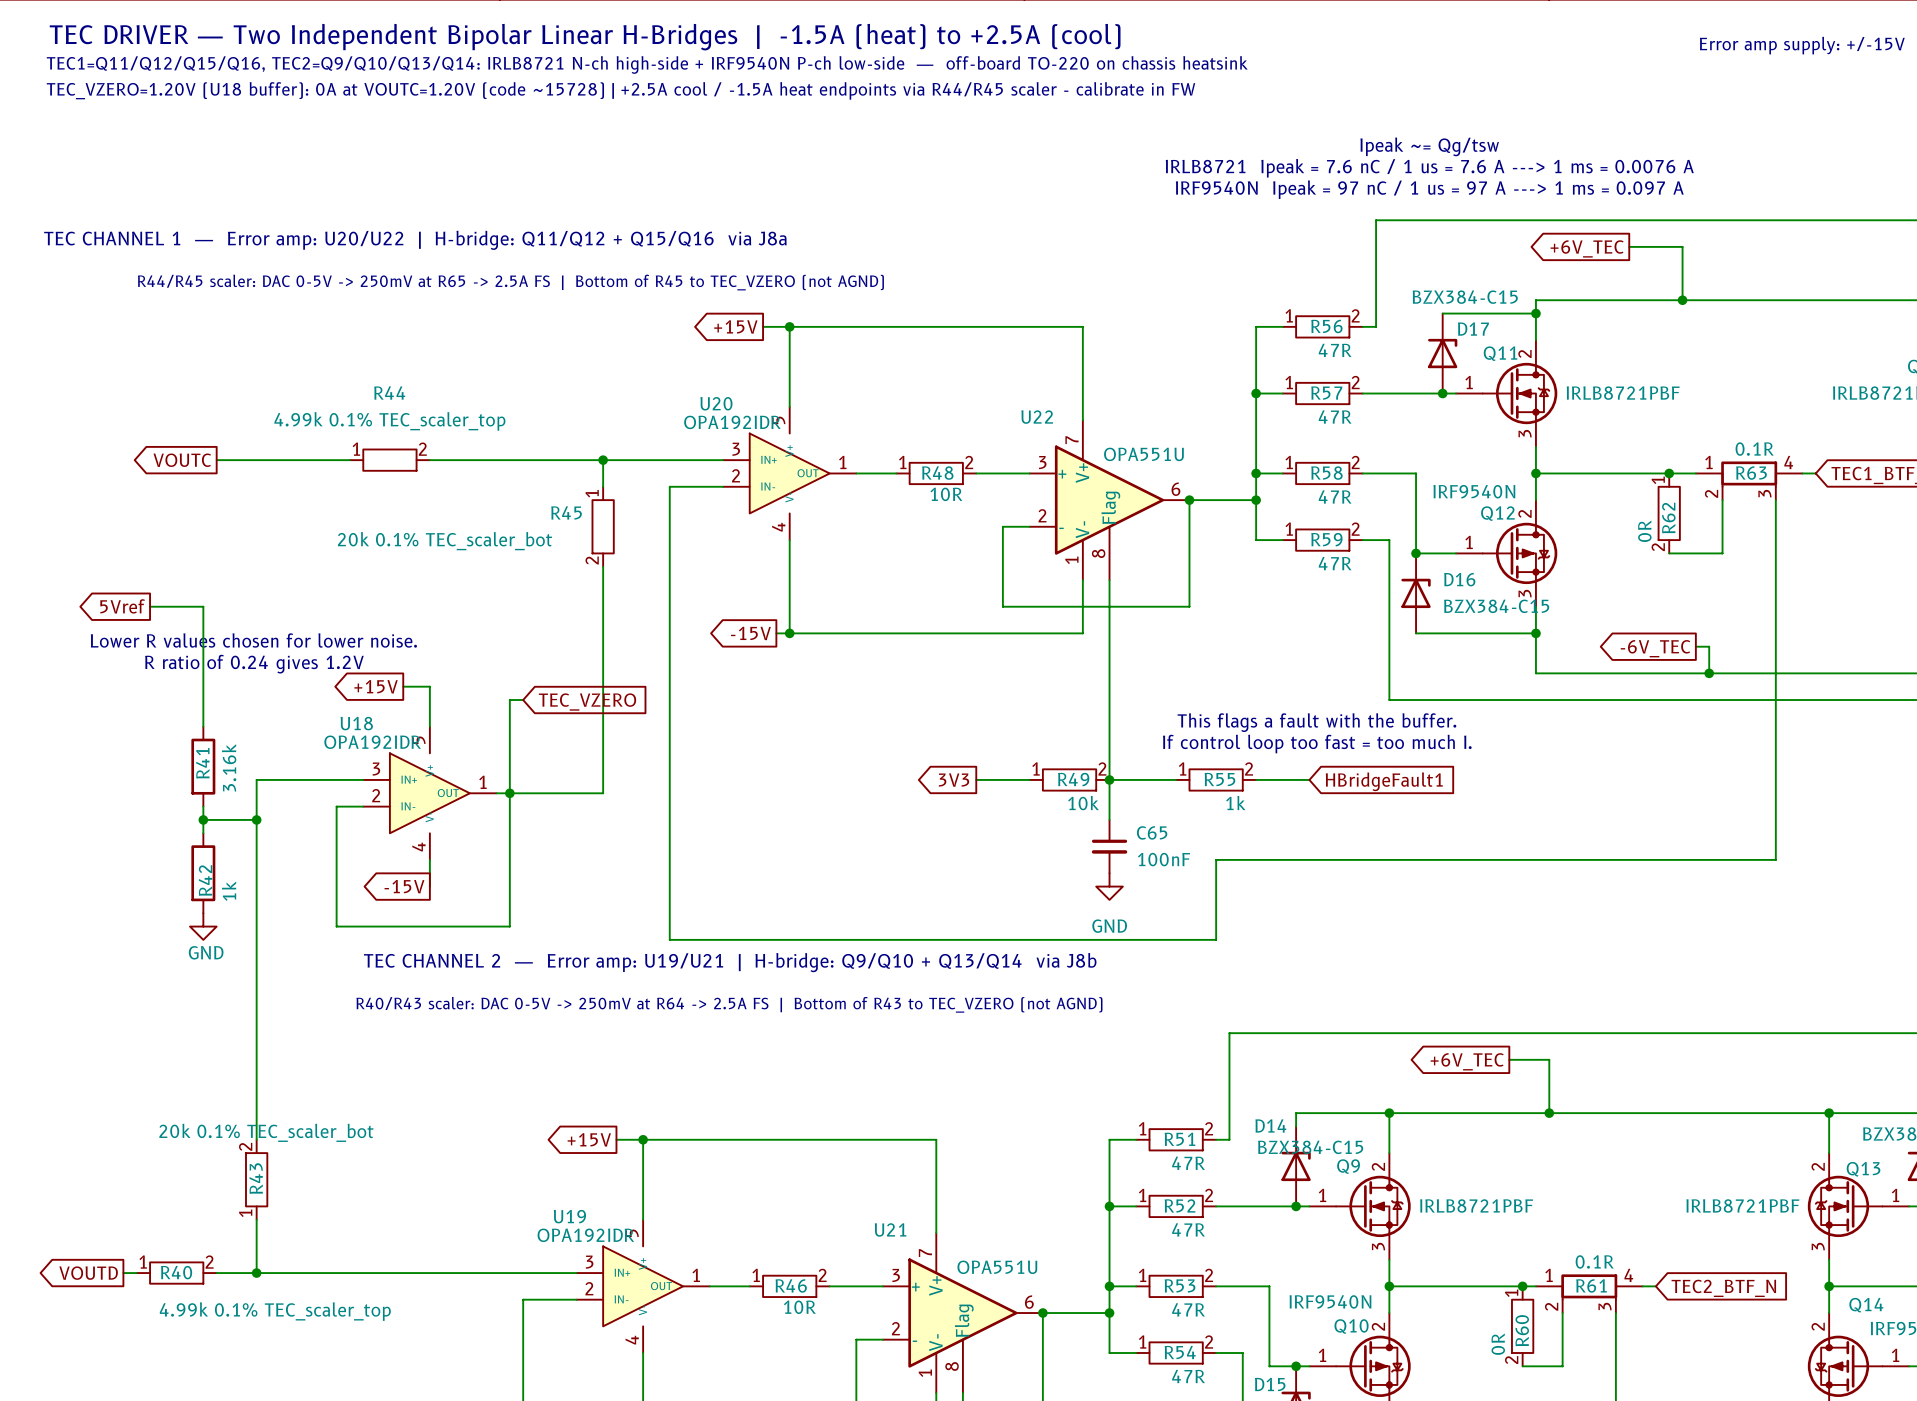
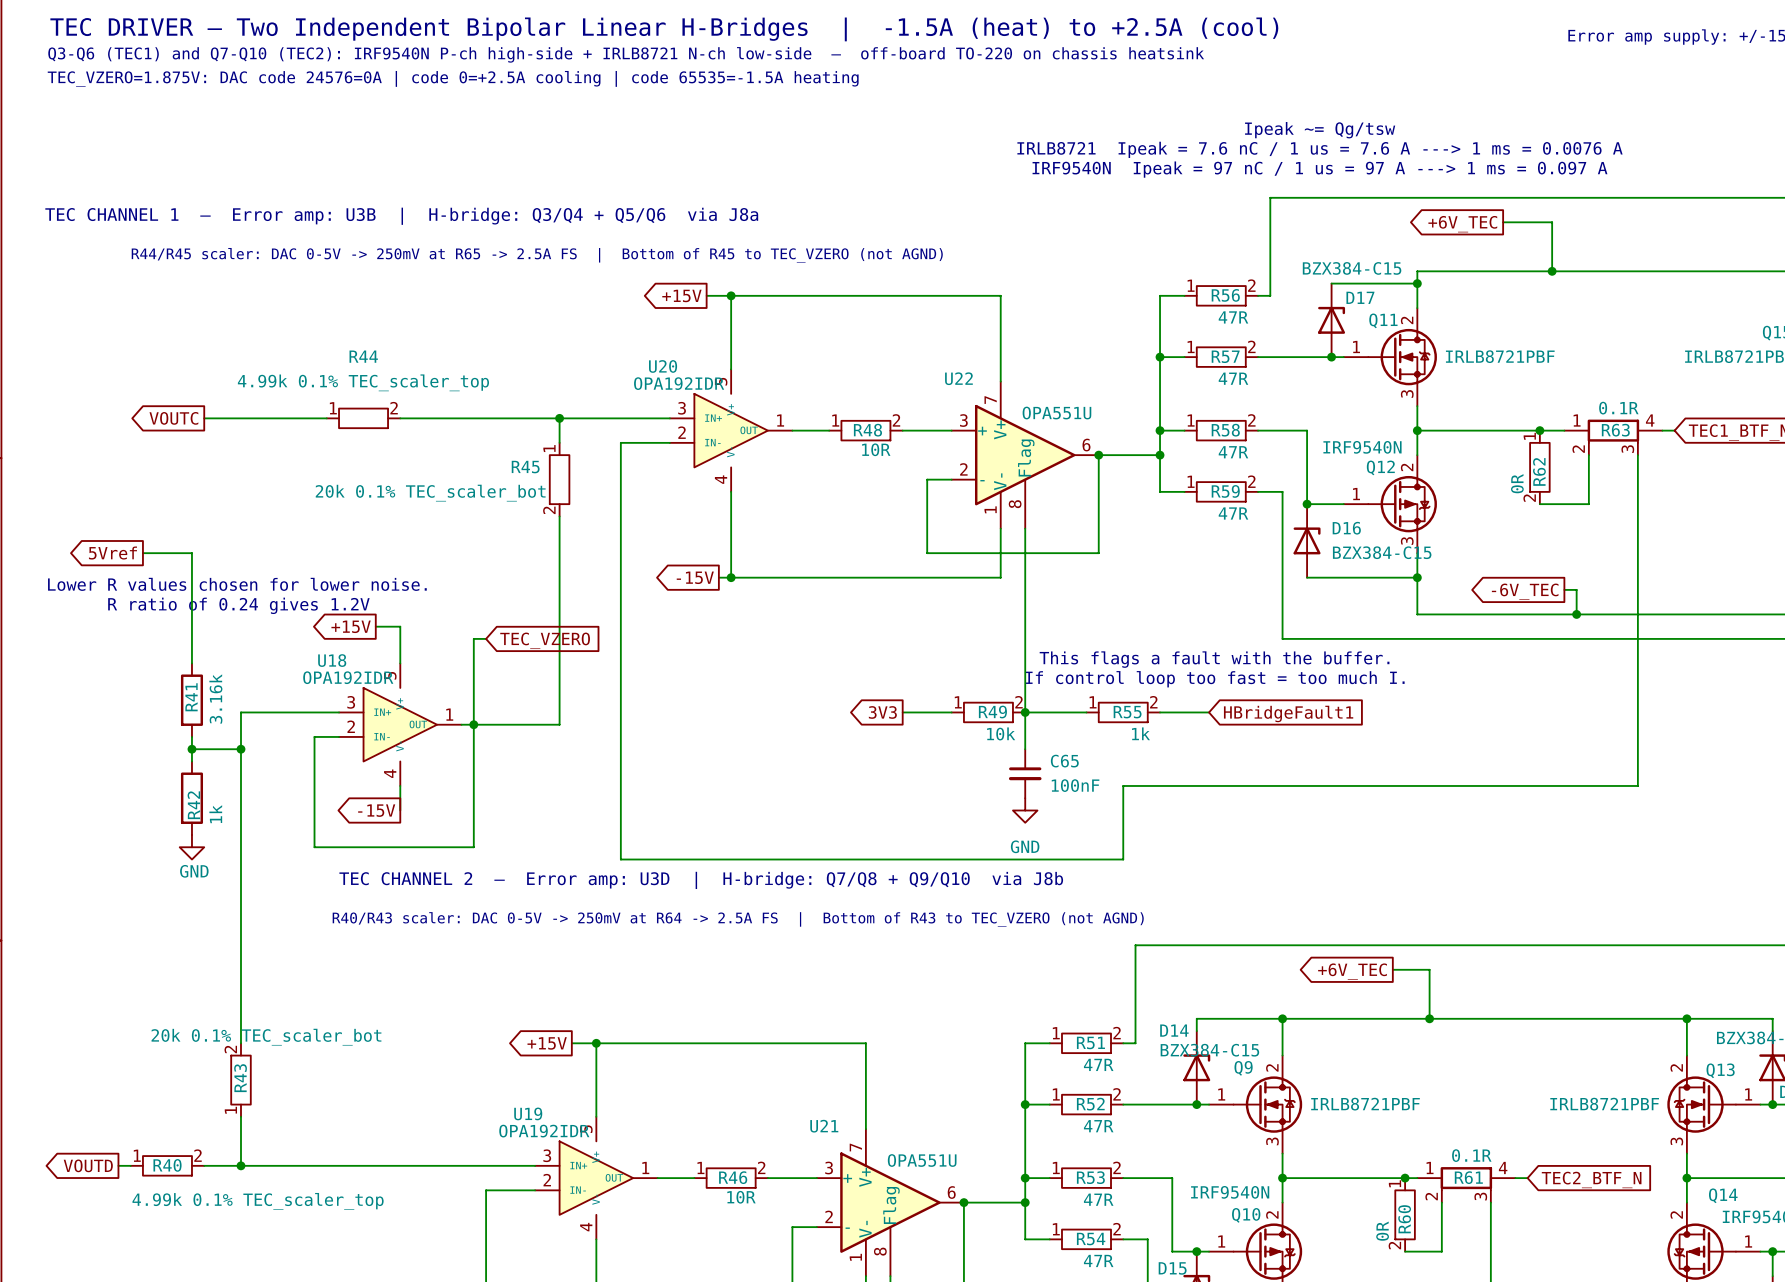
text: TEC1=Q11/Q12/Q15/Q16, TEC2=Q9/Q10/Q13/Q14: IRLB8721 N-ch high-side + IRF9540N P-ch low-side — off-board TO-220 on chassis heatsink (647, 64) -> Q3-Q6 (TEC1) and Q7-Q10 (TEC2): IRF9540N P-ch high-side + IRLB8721 N-ch low-side — off-board TO-220 on chassis heatsink (626, 54)
text: TEC_VZERO=1.20V (U18 buffer): 0A at VOUTC=1.20V (code ~15728) | +2.5A cool / -1.5A heat endpoints via R44/R45 scaler - calibrate in FW (620, 90) -> TEC_VZERO=1.875V: DAC code 24576=0A | code 0=+2.5A cooling | code 65535=-1.5A heating (453, 78)
text: TEC CHANNEL 1 — Error amp: U20/U22 | H-bridge: Q11/Q12 + Q15/Q16 via J8a (415, 240) -> TEC CHANNEL 1 — Error amp: U3B | H-bridge: Q3/Q4 + Q5/Q6 via J8a (401, 216)
text: TEC CHANNEL 2 — Error amp: U19/U21 | H-bridge: Q9/Q10 + Q13/Q14 via J8b (730, 962) -> TEC CHANNEL 2 — Error amp: U3D | H-bridge: Q7/Q8 + Q9/Q10 via J8b (701, 880)

